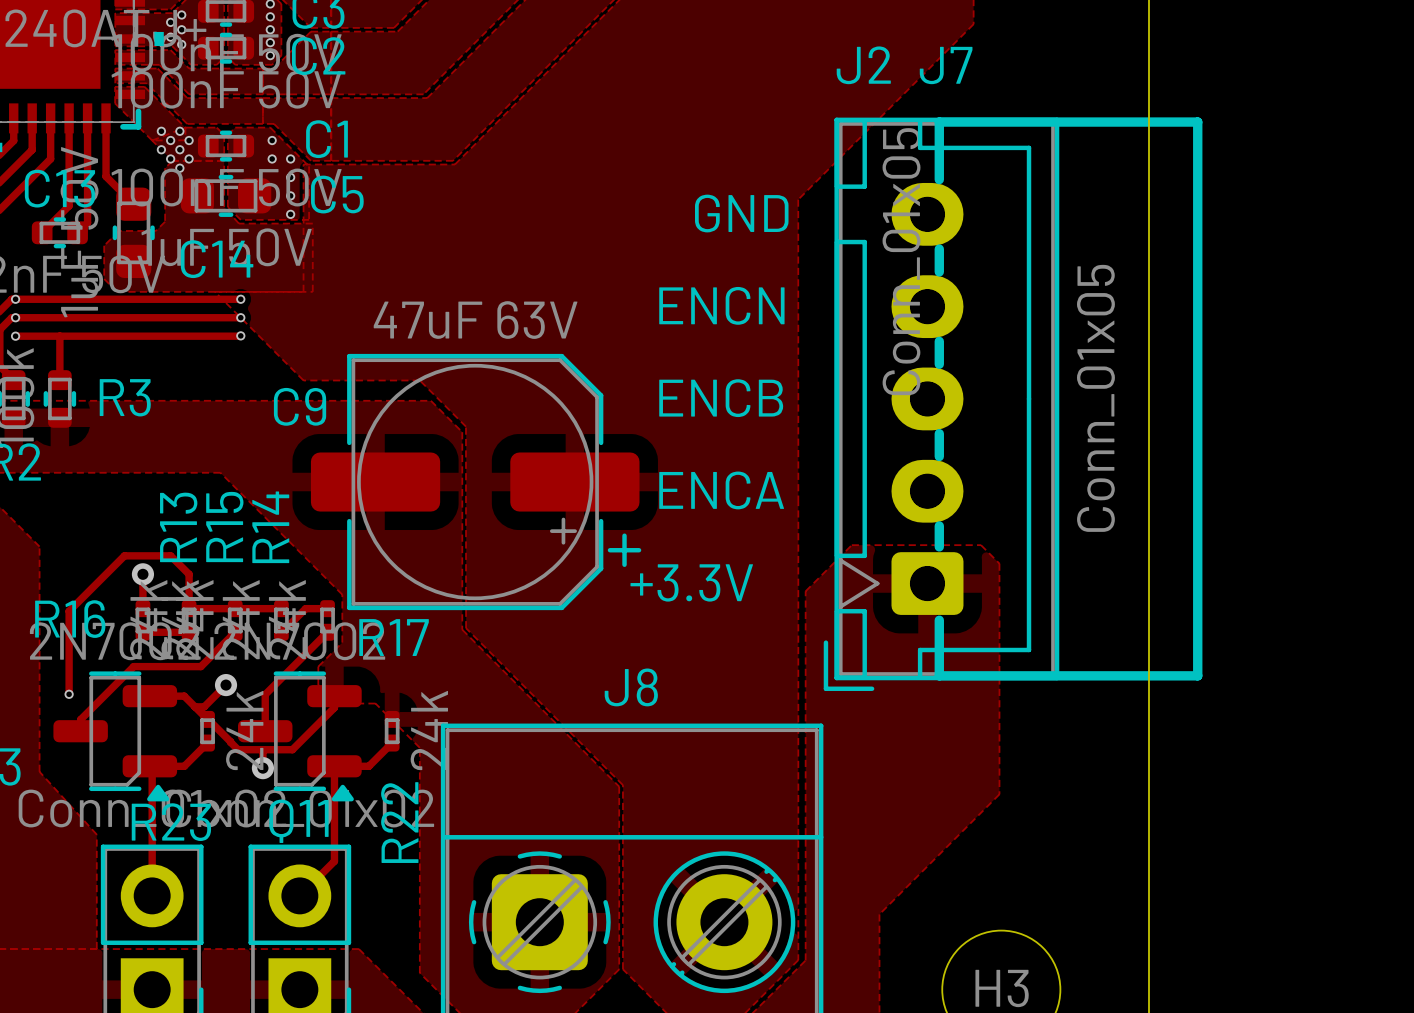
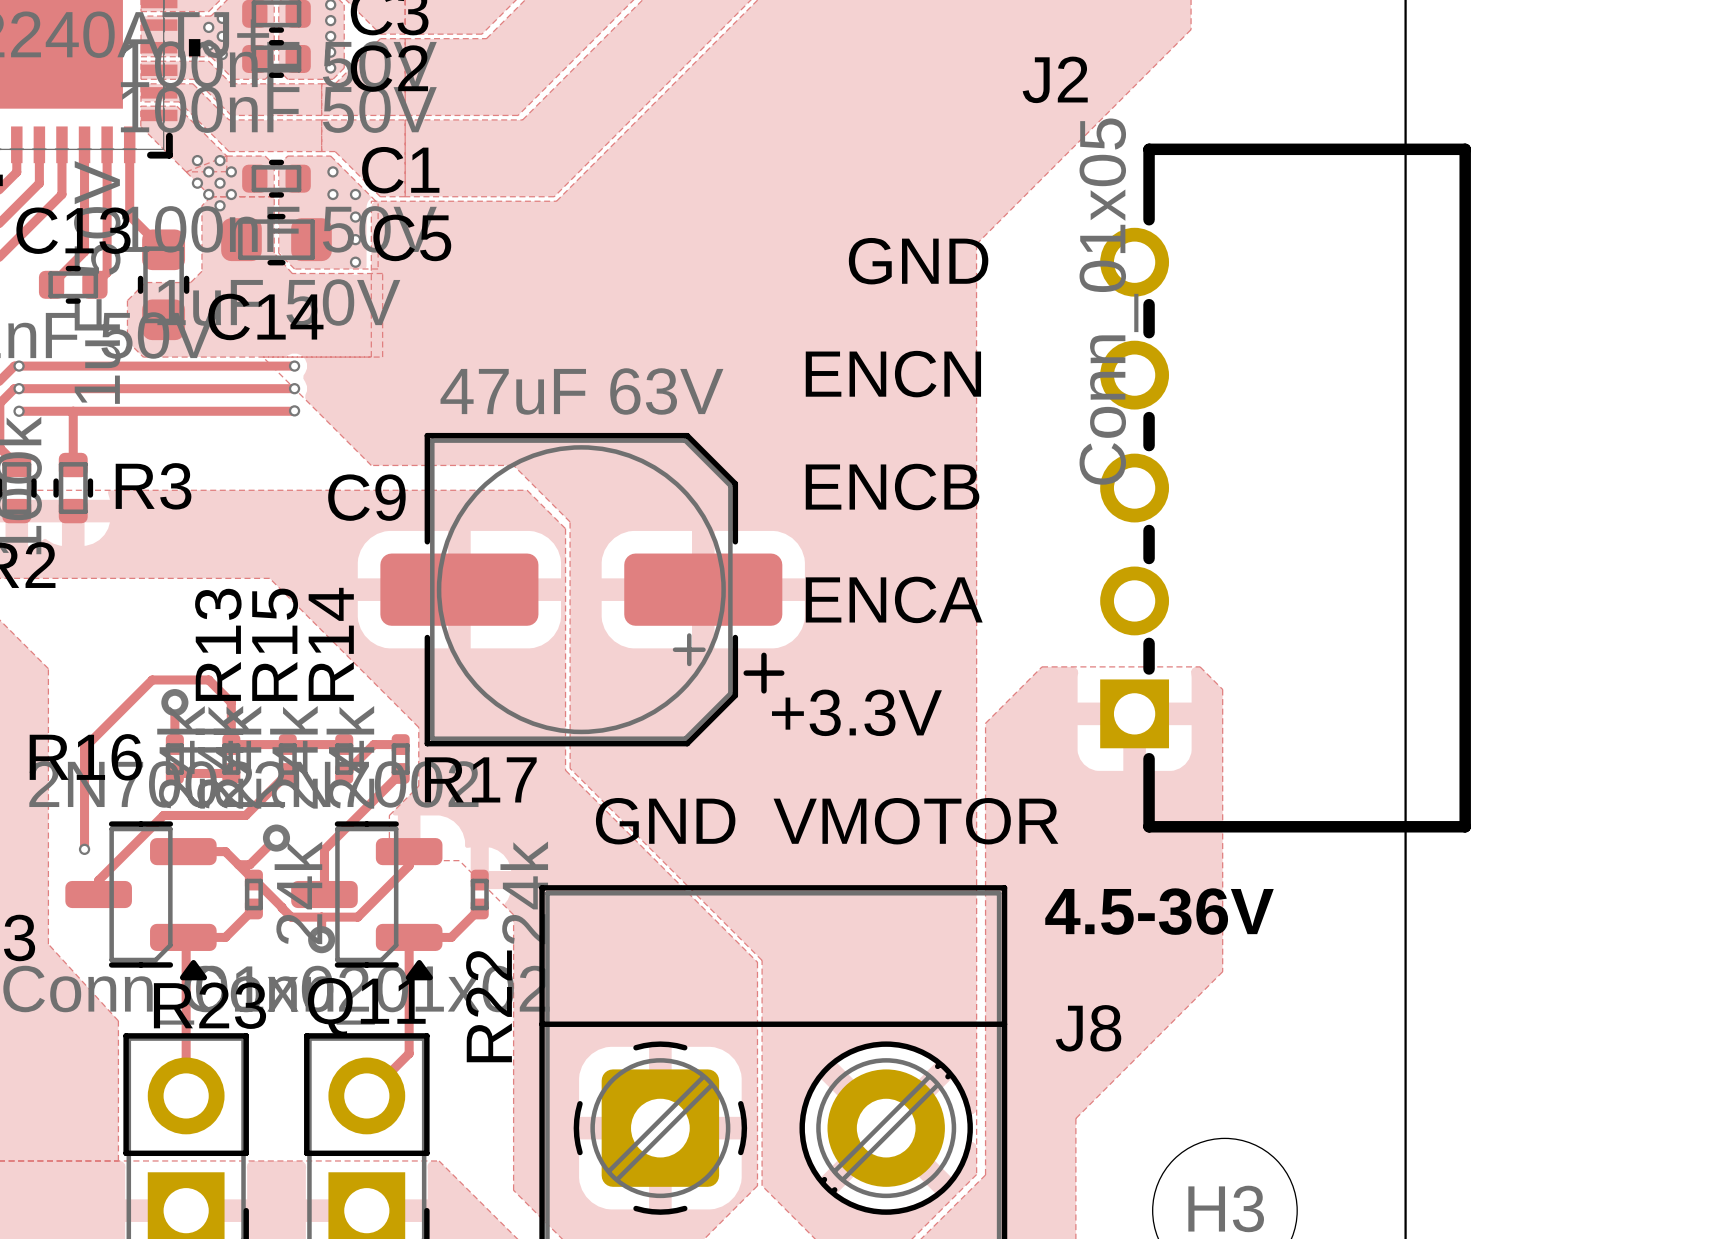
J7: Conn_01x05 (941, 404) -> none
text: none -> GND (665, 821)
text: none -> VMOTOR (915, 821)
J8 name position: J8 (631, 687) -> J8 (1088, 1028)
text: none -> 4.5-36V (1159, 911)

